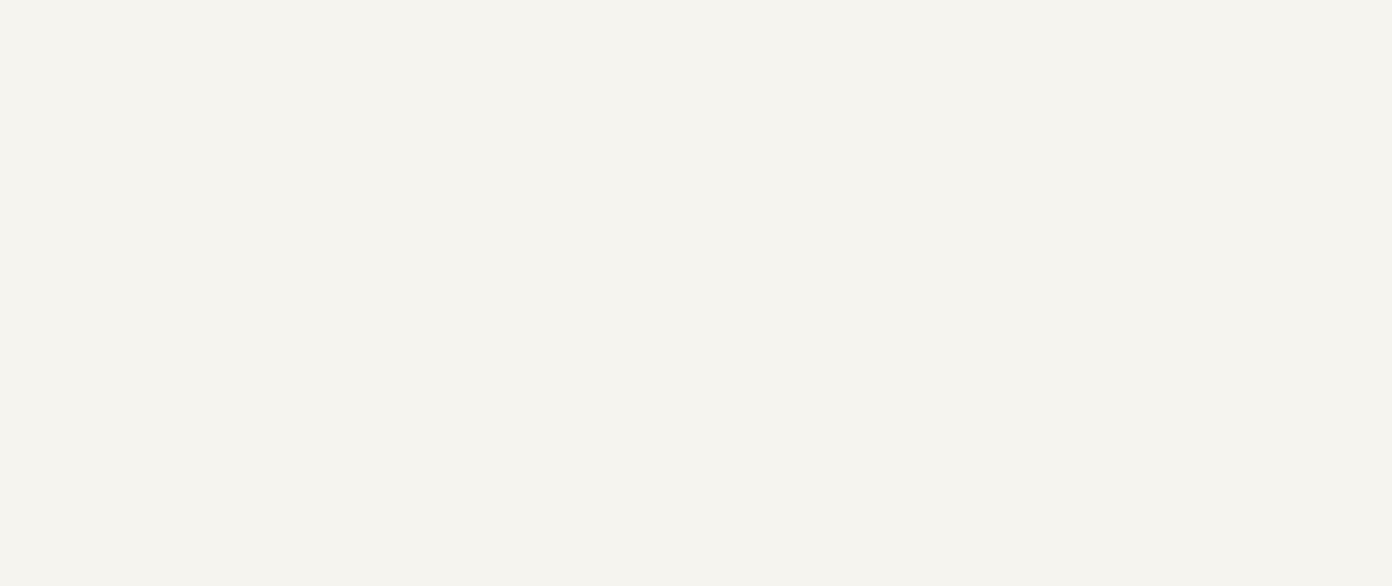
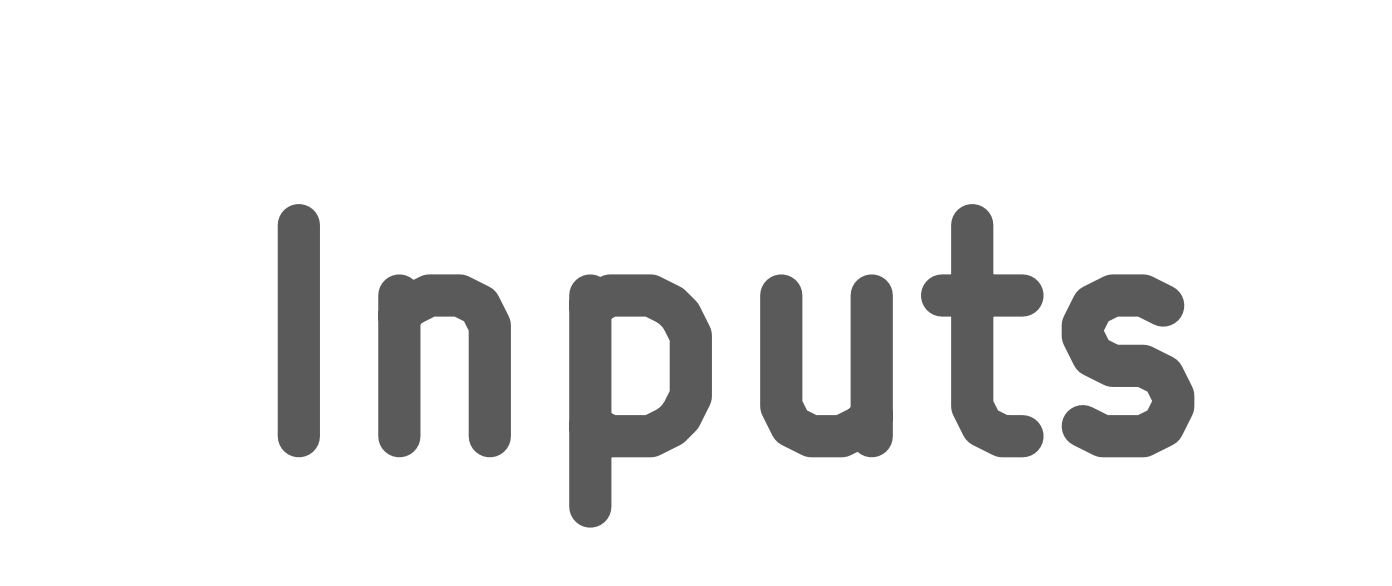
text: none -> Inputs (736, 365)

